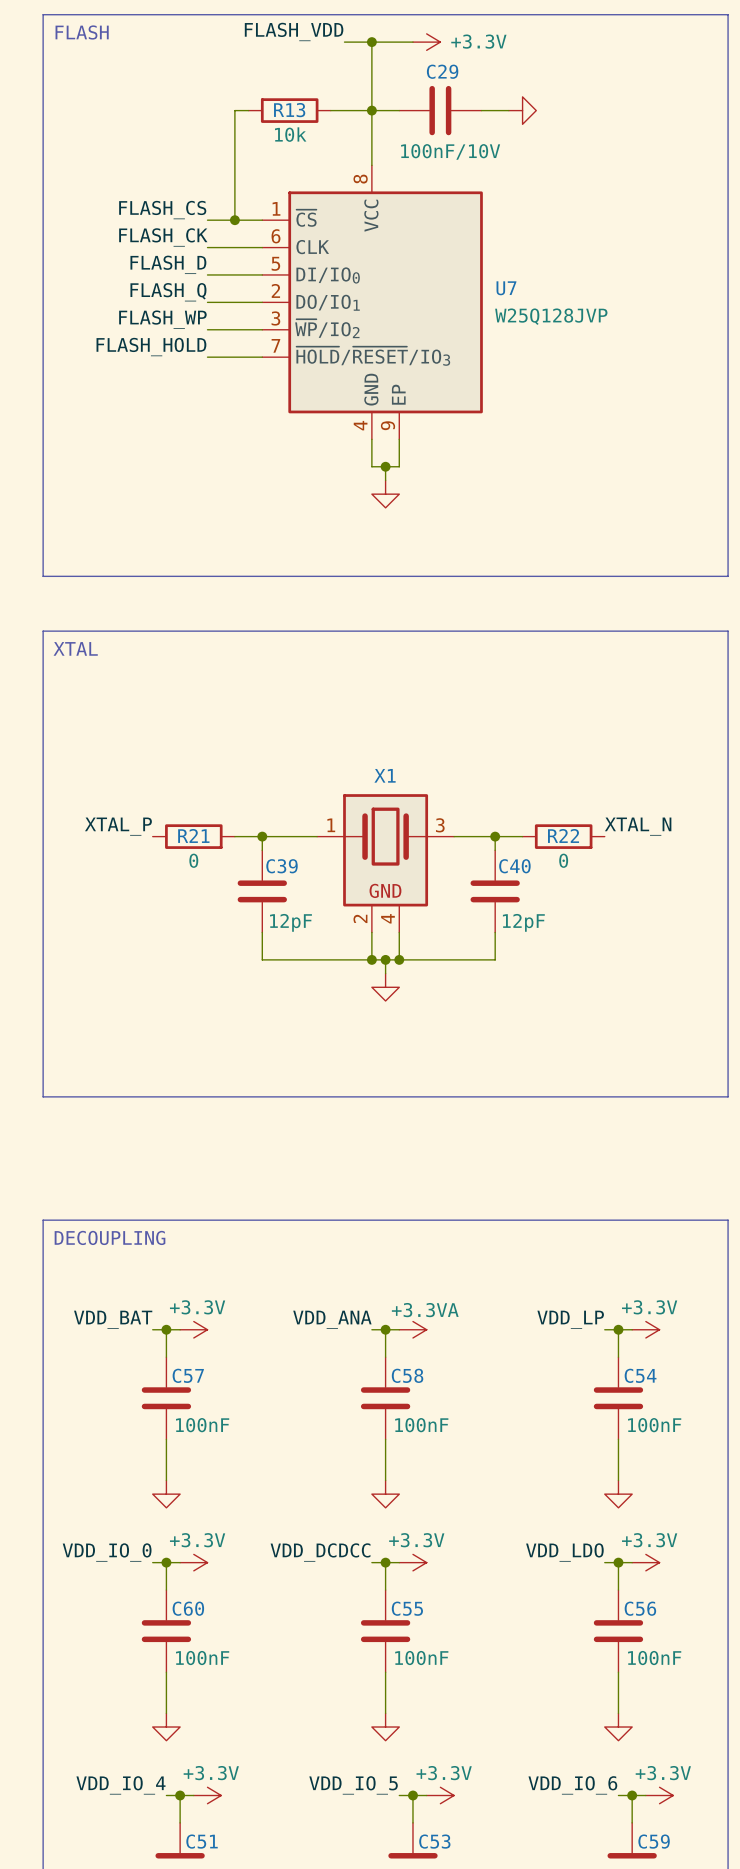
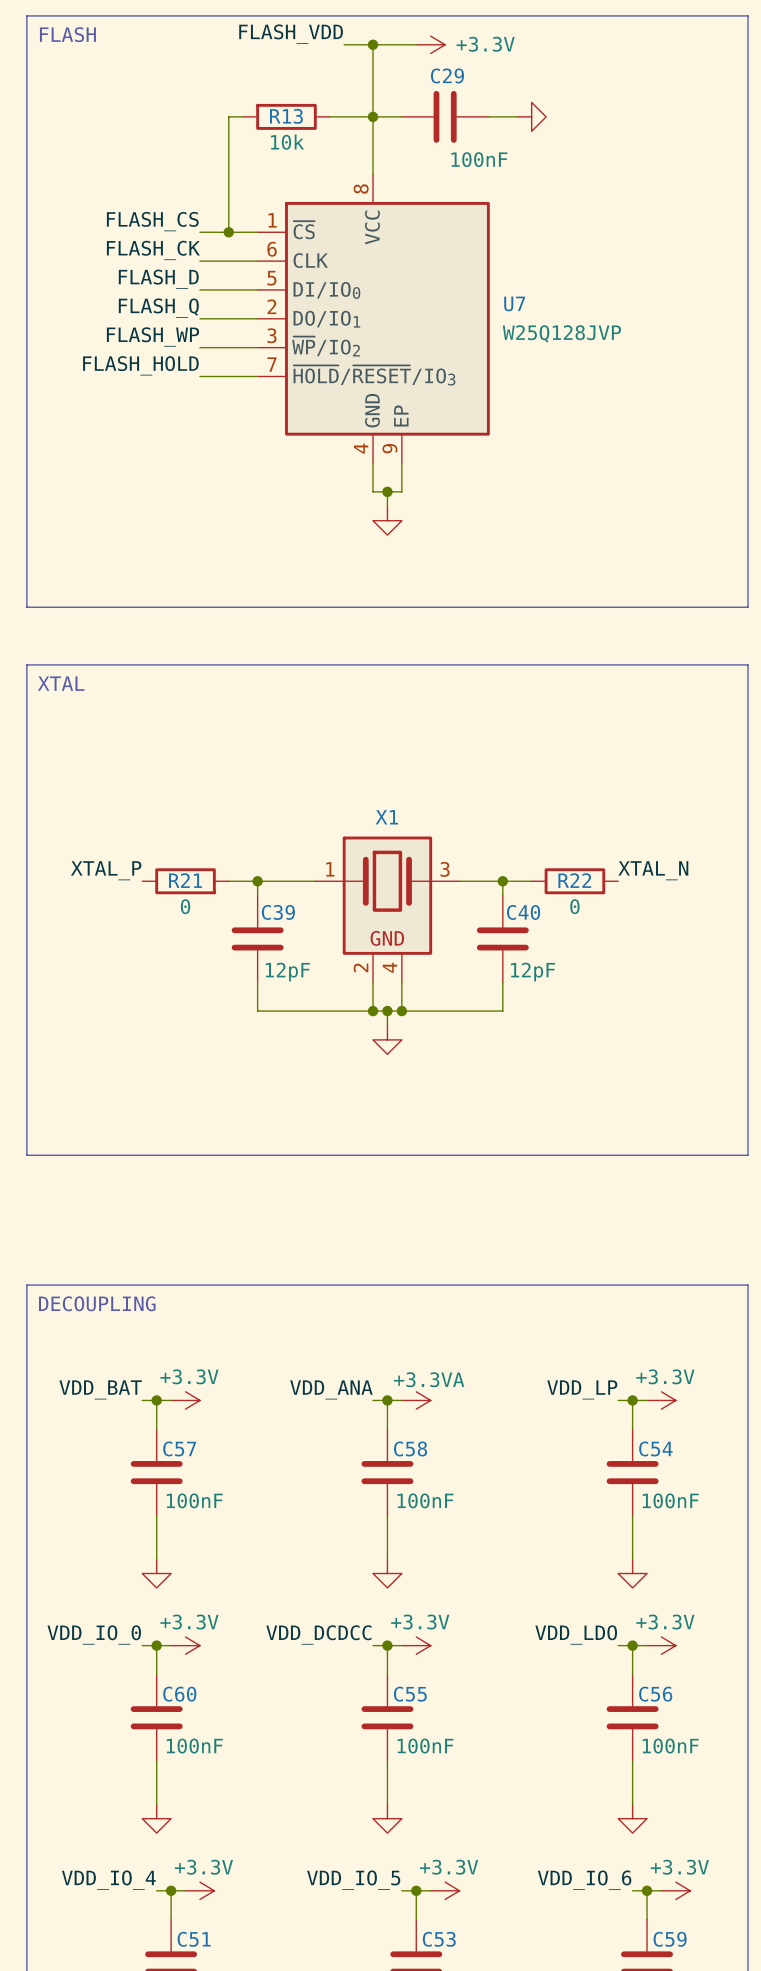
C29 value: 100nF/10V (450, 151) -> 100nF (479, 159)

